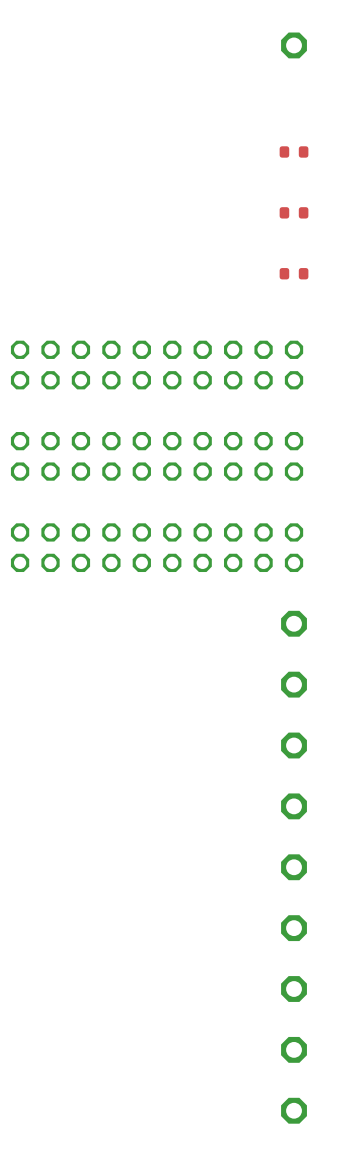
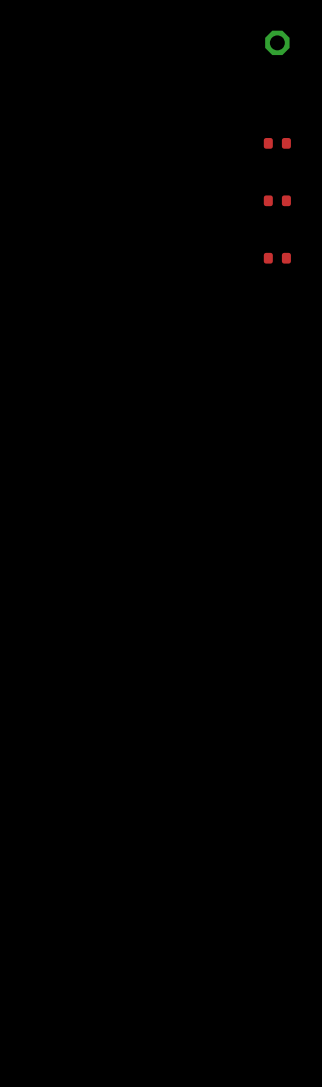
part: (157, 365) -> none
part: (157, 456) -> none
part: (157, 547) -> none
part: (294, 623) -> none
part: (294, 684) -> none
part: (294, 745) -> none
part: (294, 806) -> none
part: (294, 867) -> none
part: (294, 928) -> none
part: (294, 989) -> none
part: (294, 1049) -> none
part: (294, 1110) -> none

